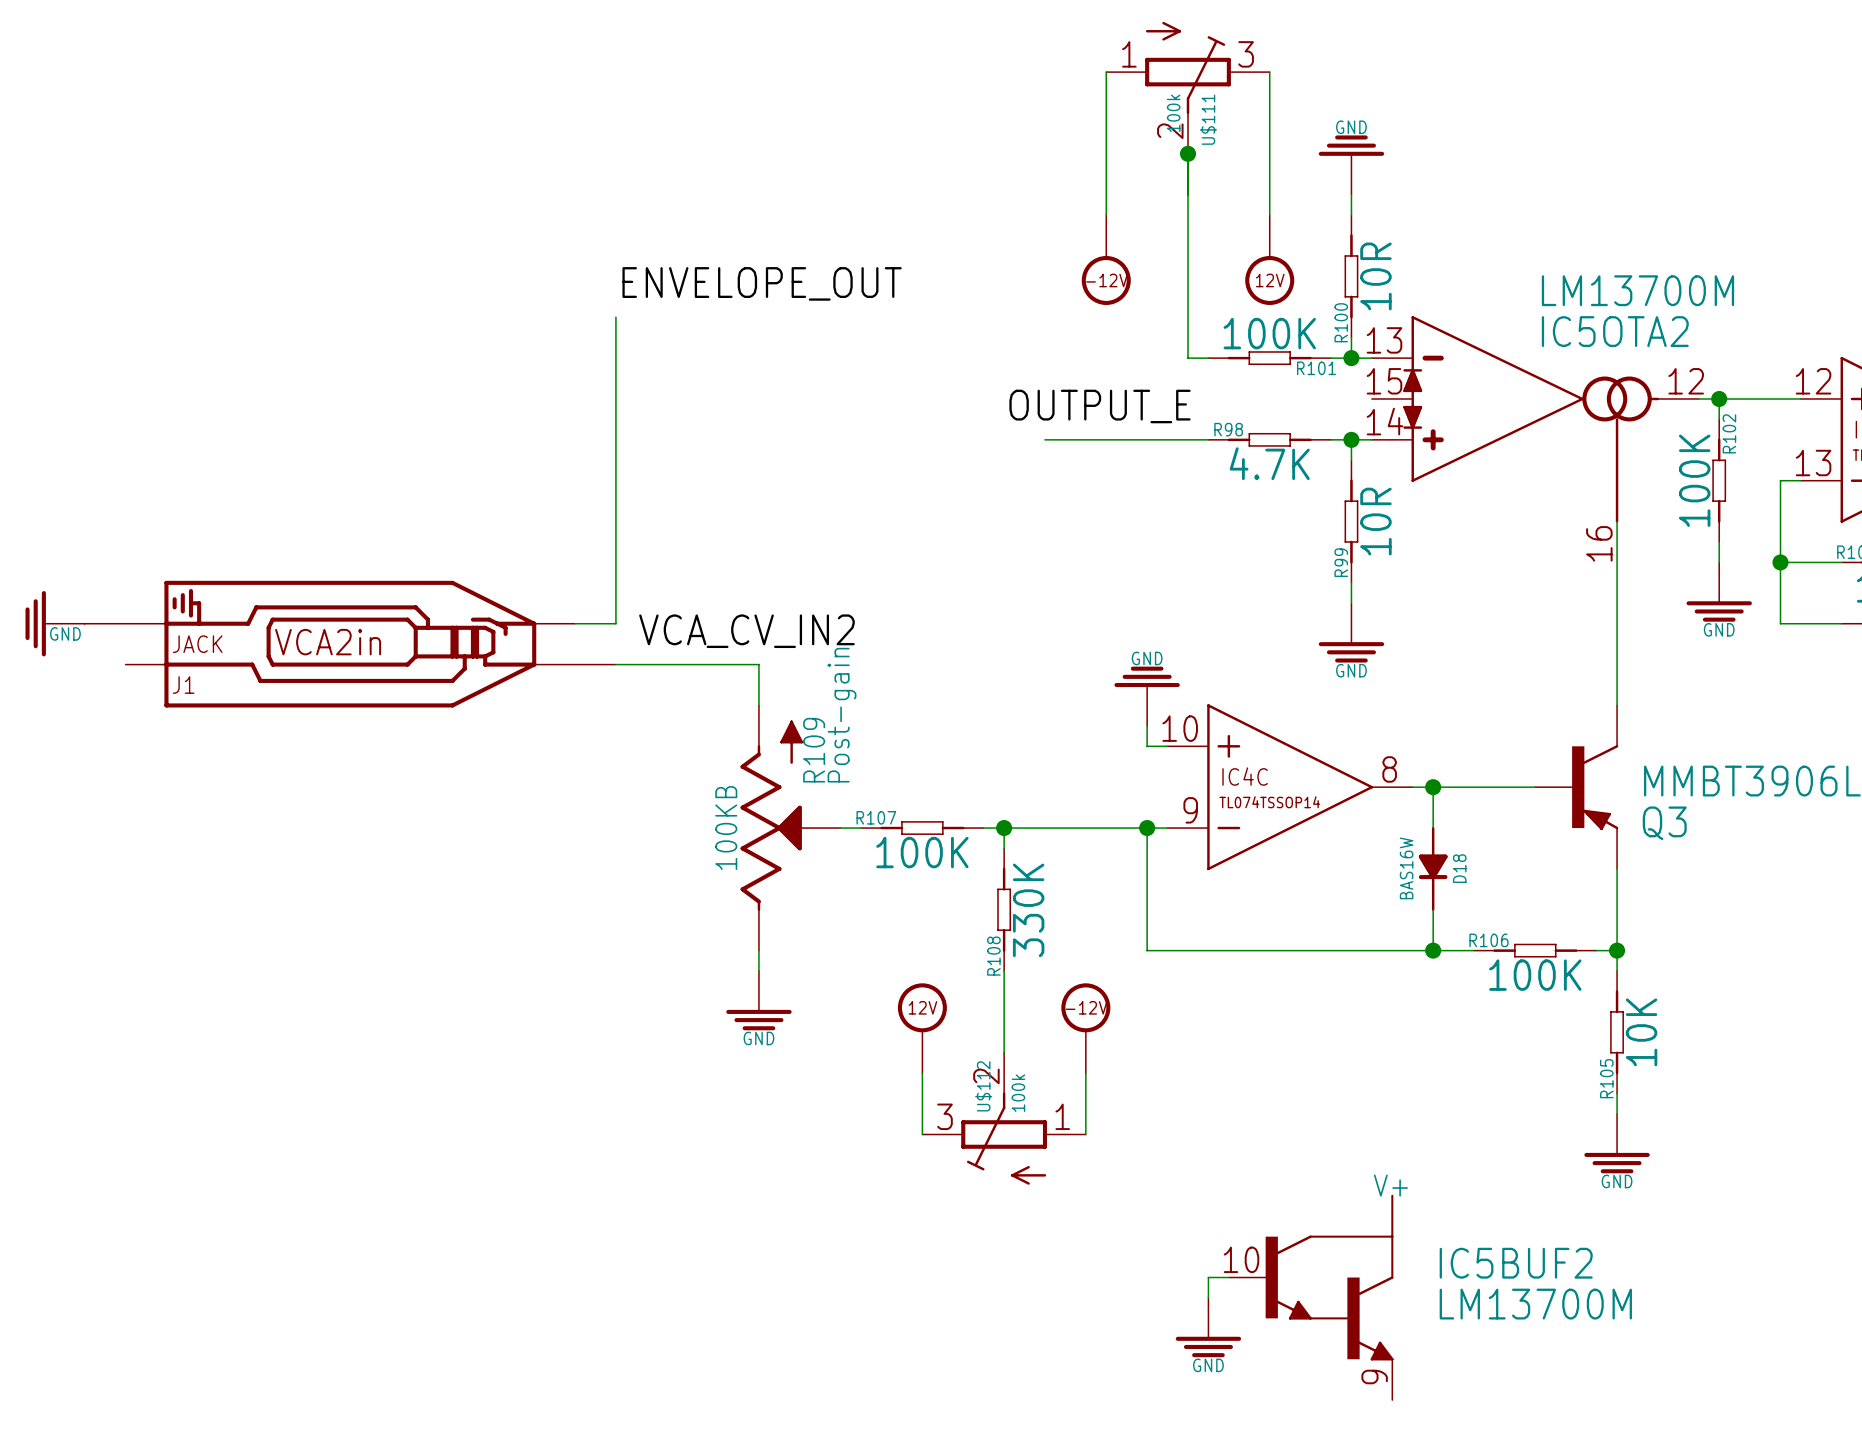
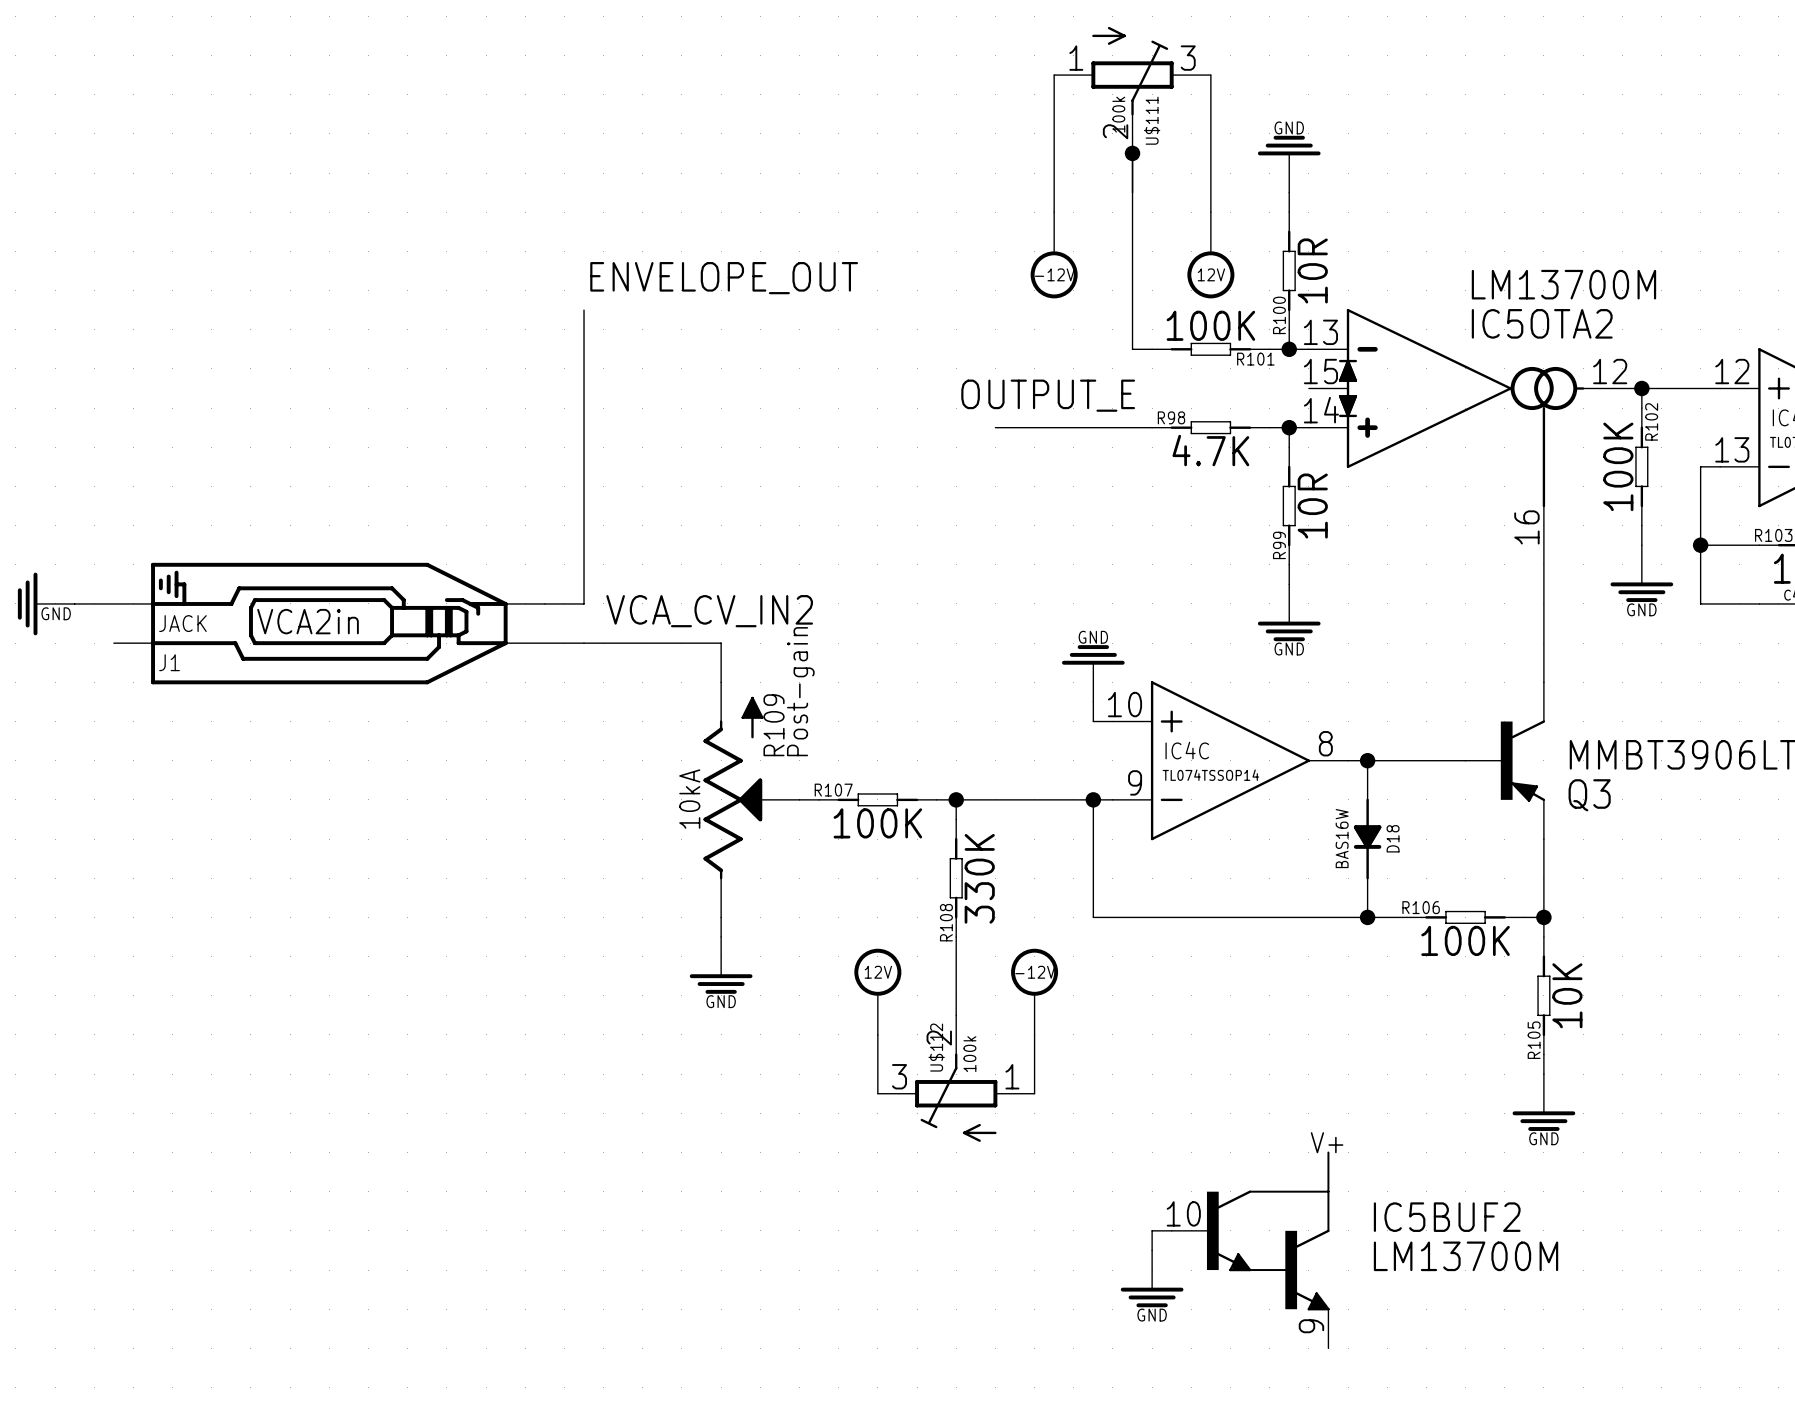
R109 value: 100KB (726, 828) -> 10kA (689, 799)

